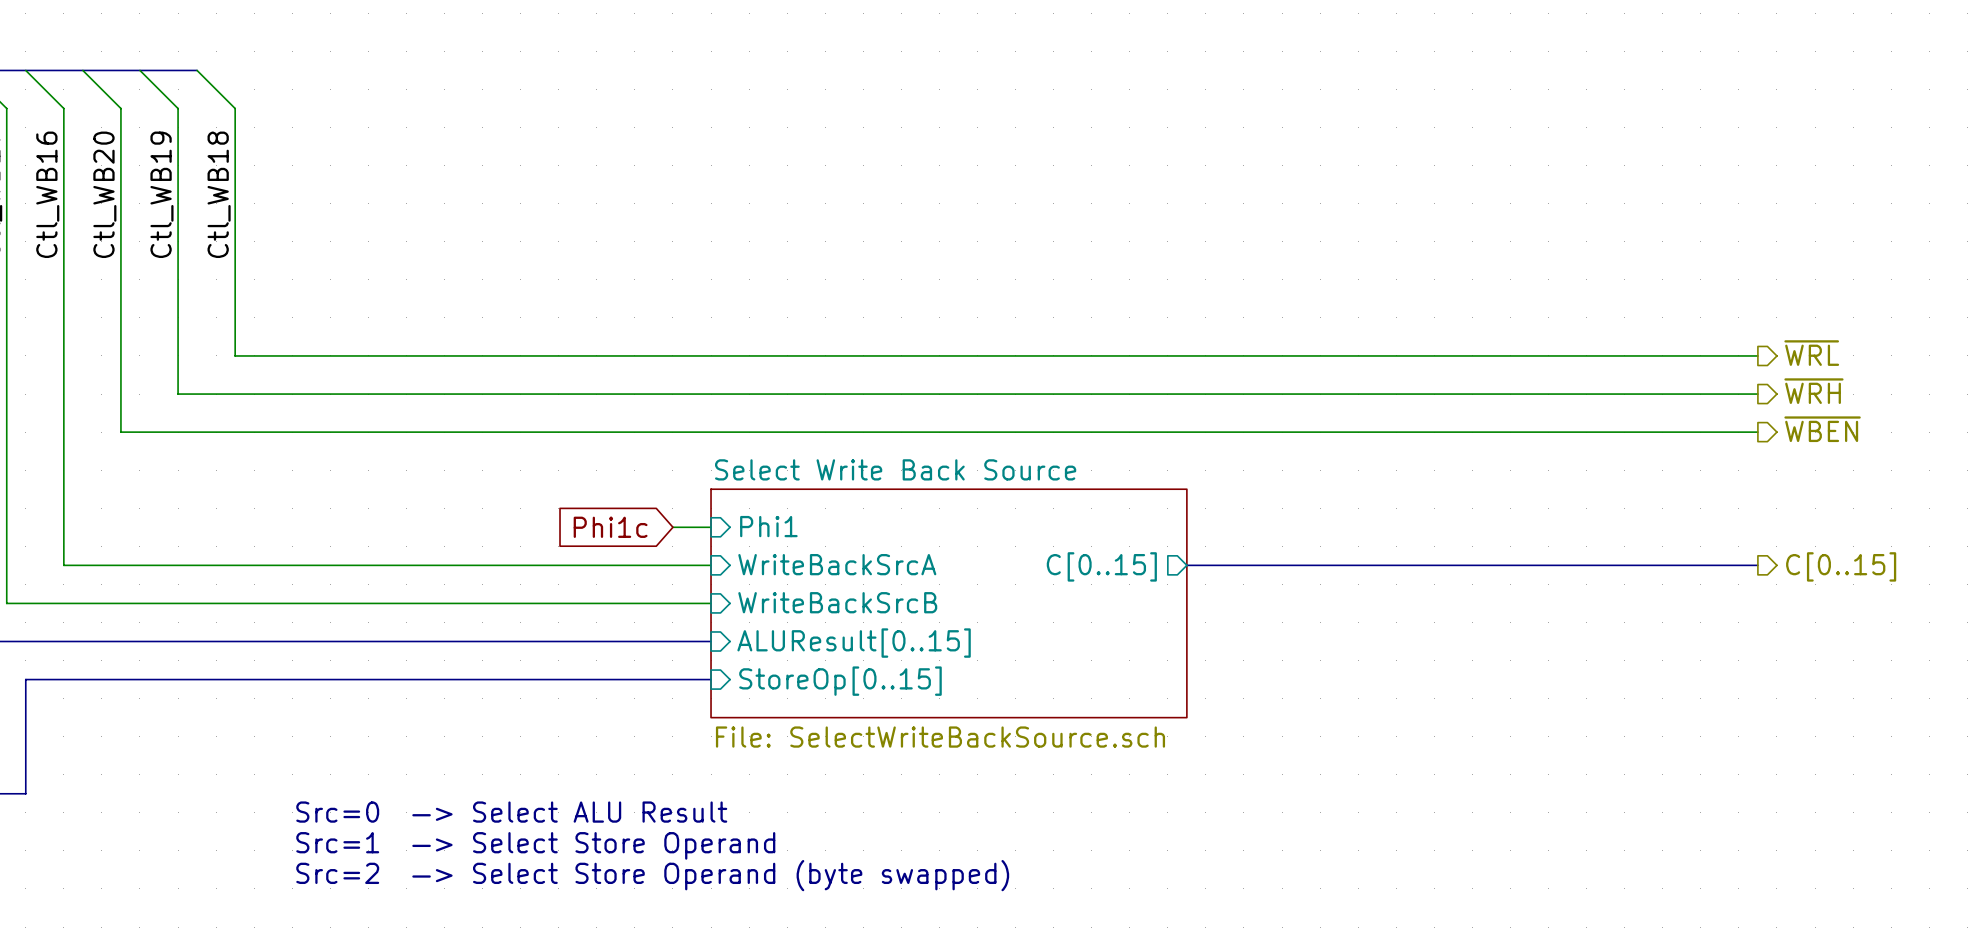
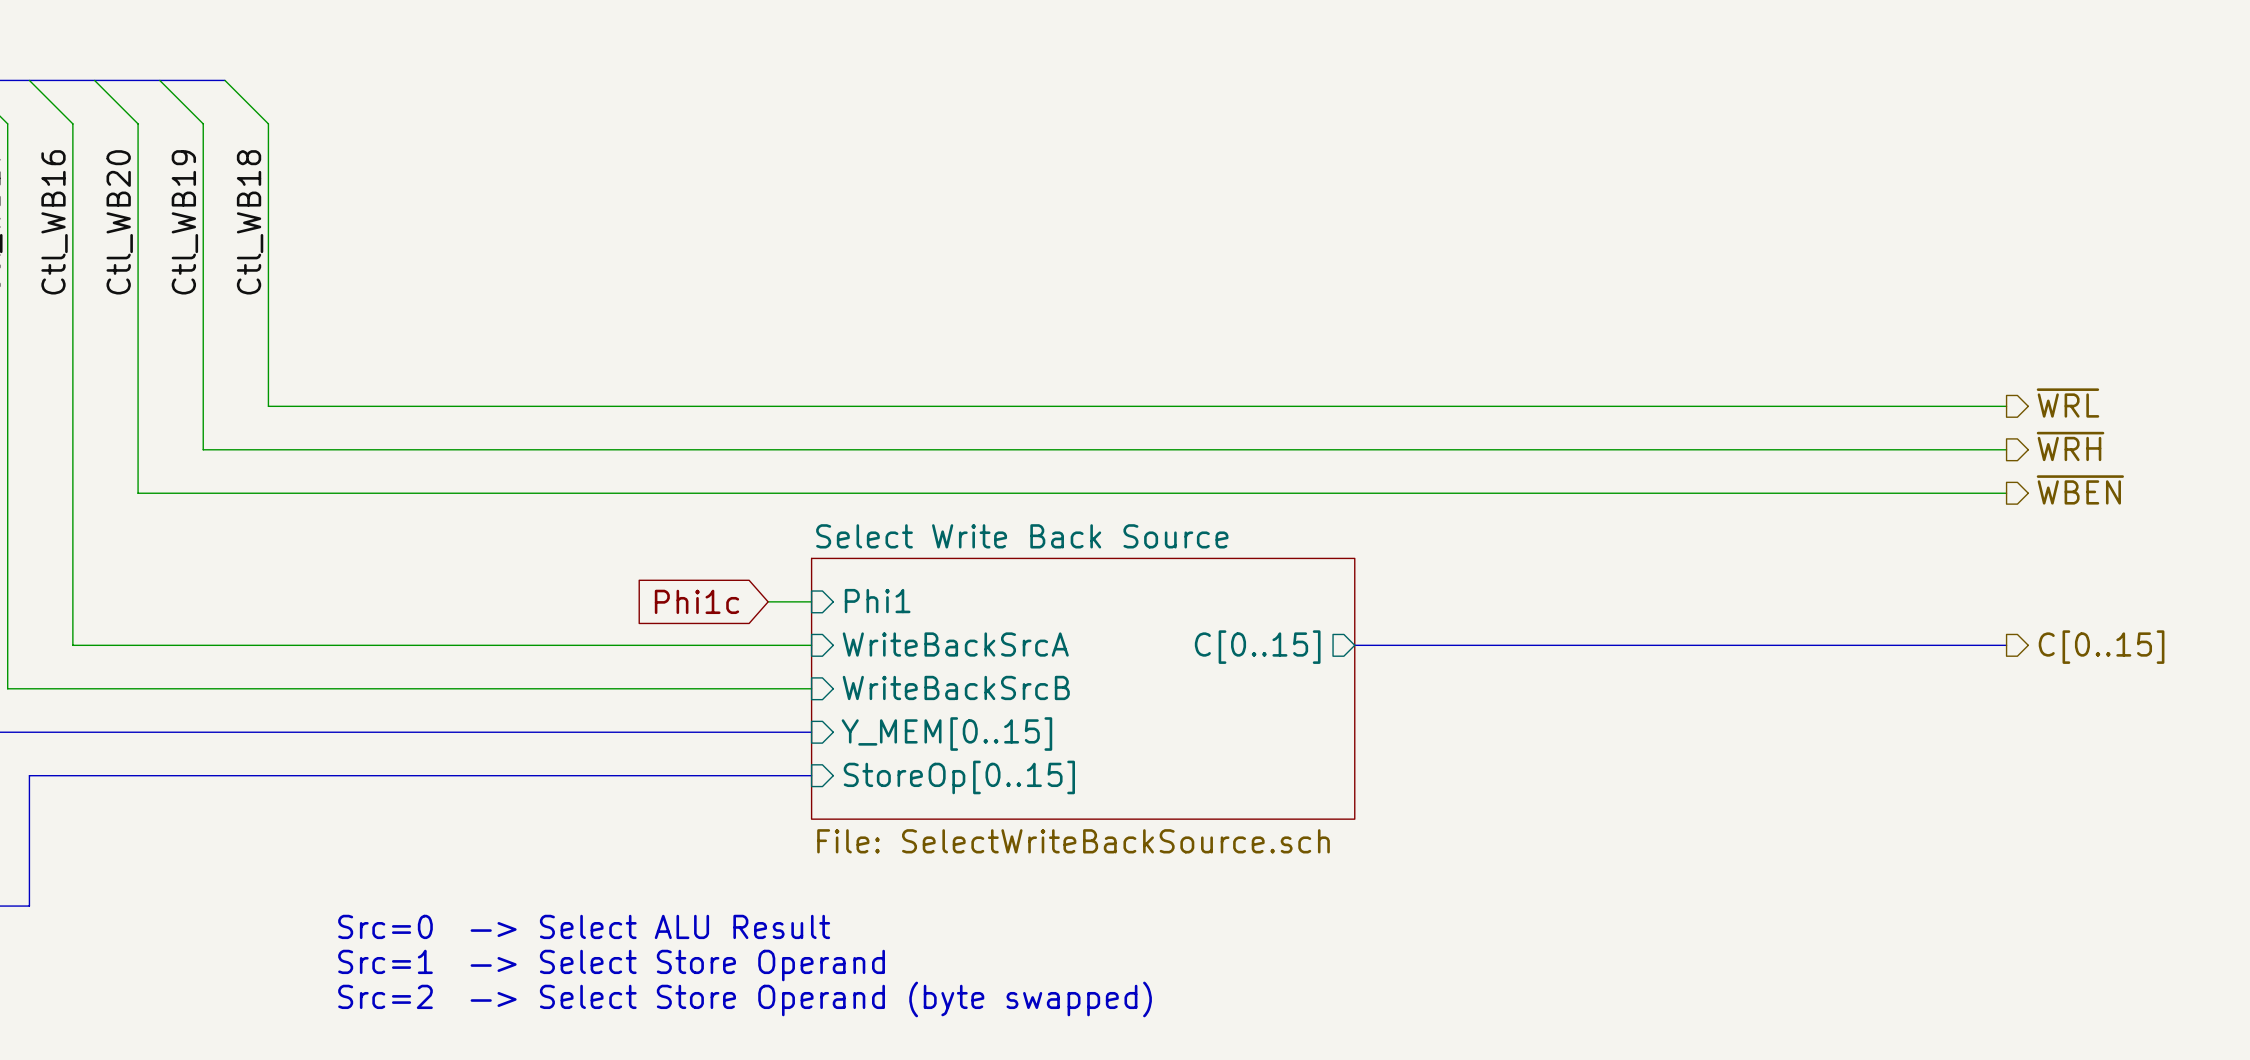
sheet pin: ALUResult[0..15] (854, 643) -> Y_MEM[0..15] (946, 734)

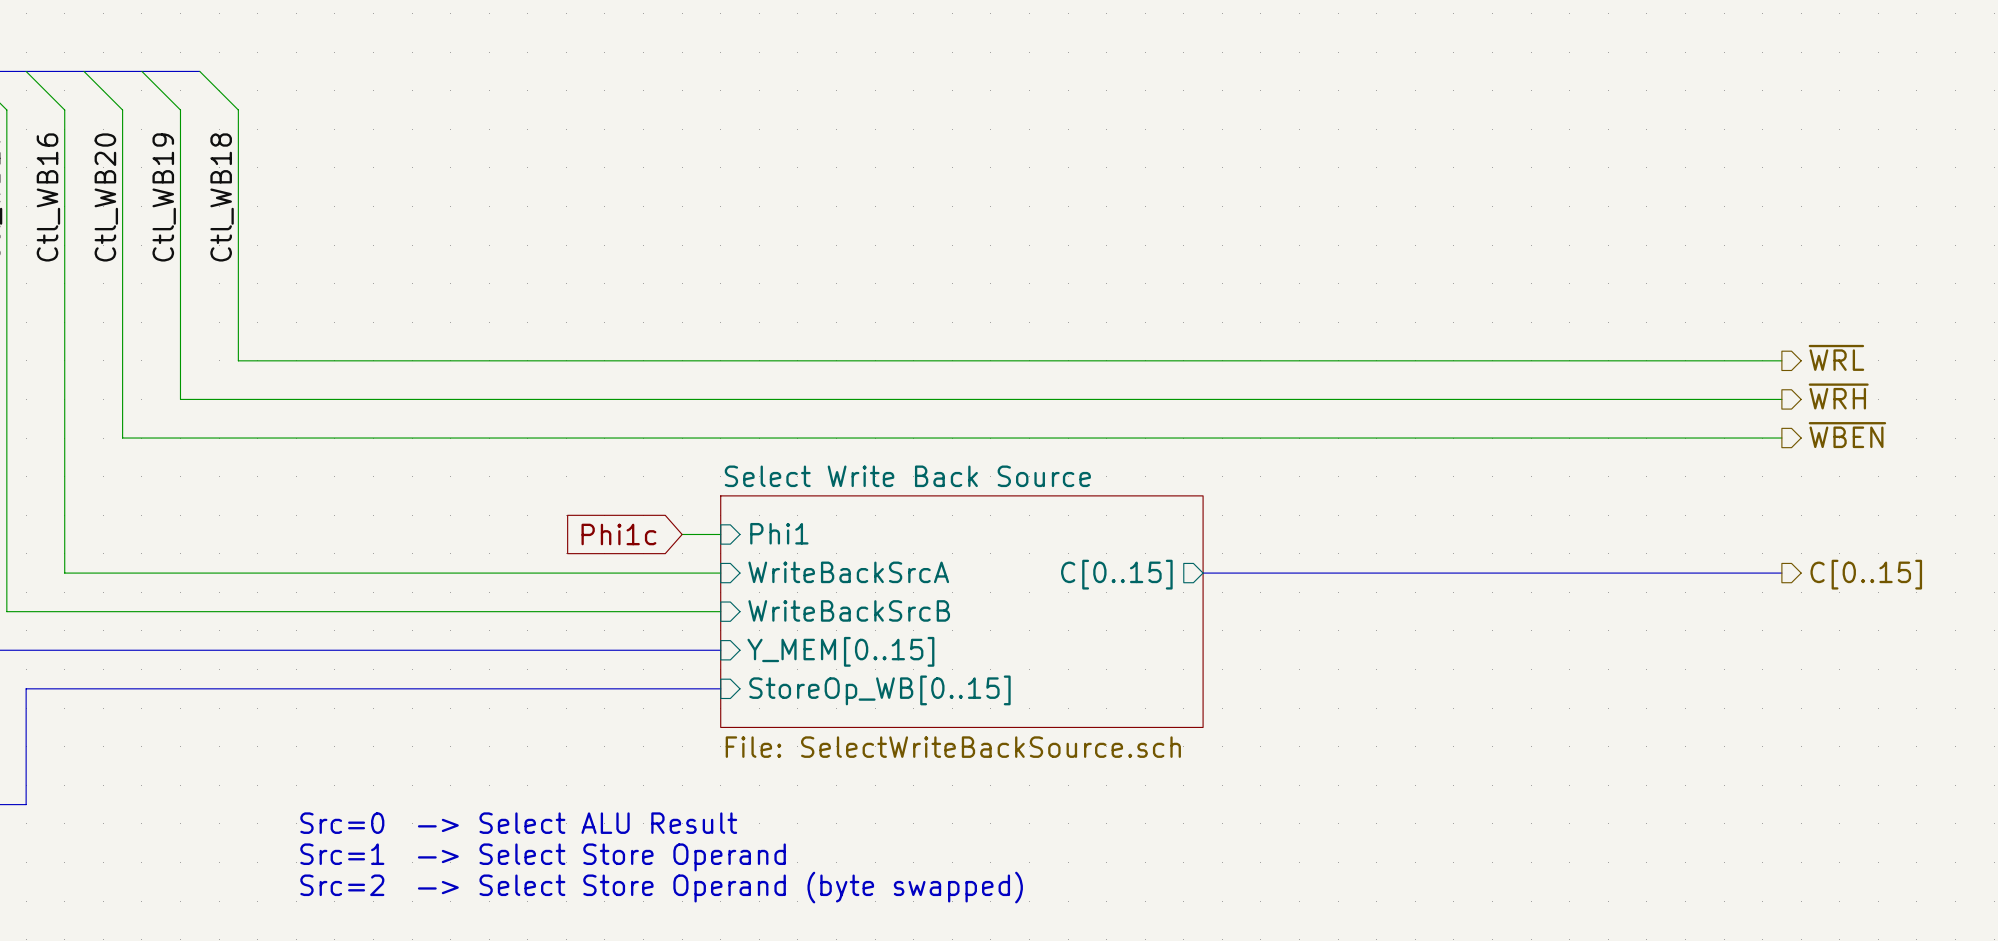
sheet pin: StoreOp[0..15] (959, 777) -> StoreOp_WB[0..15] (879, 690)

